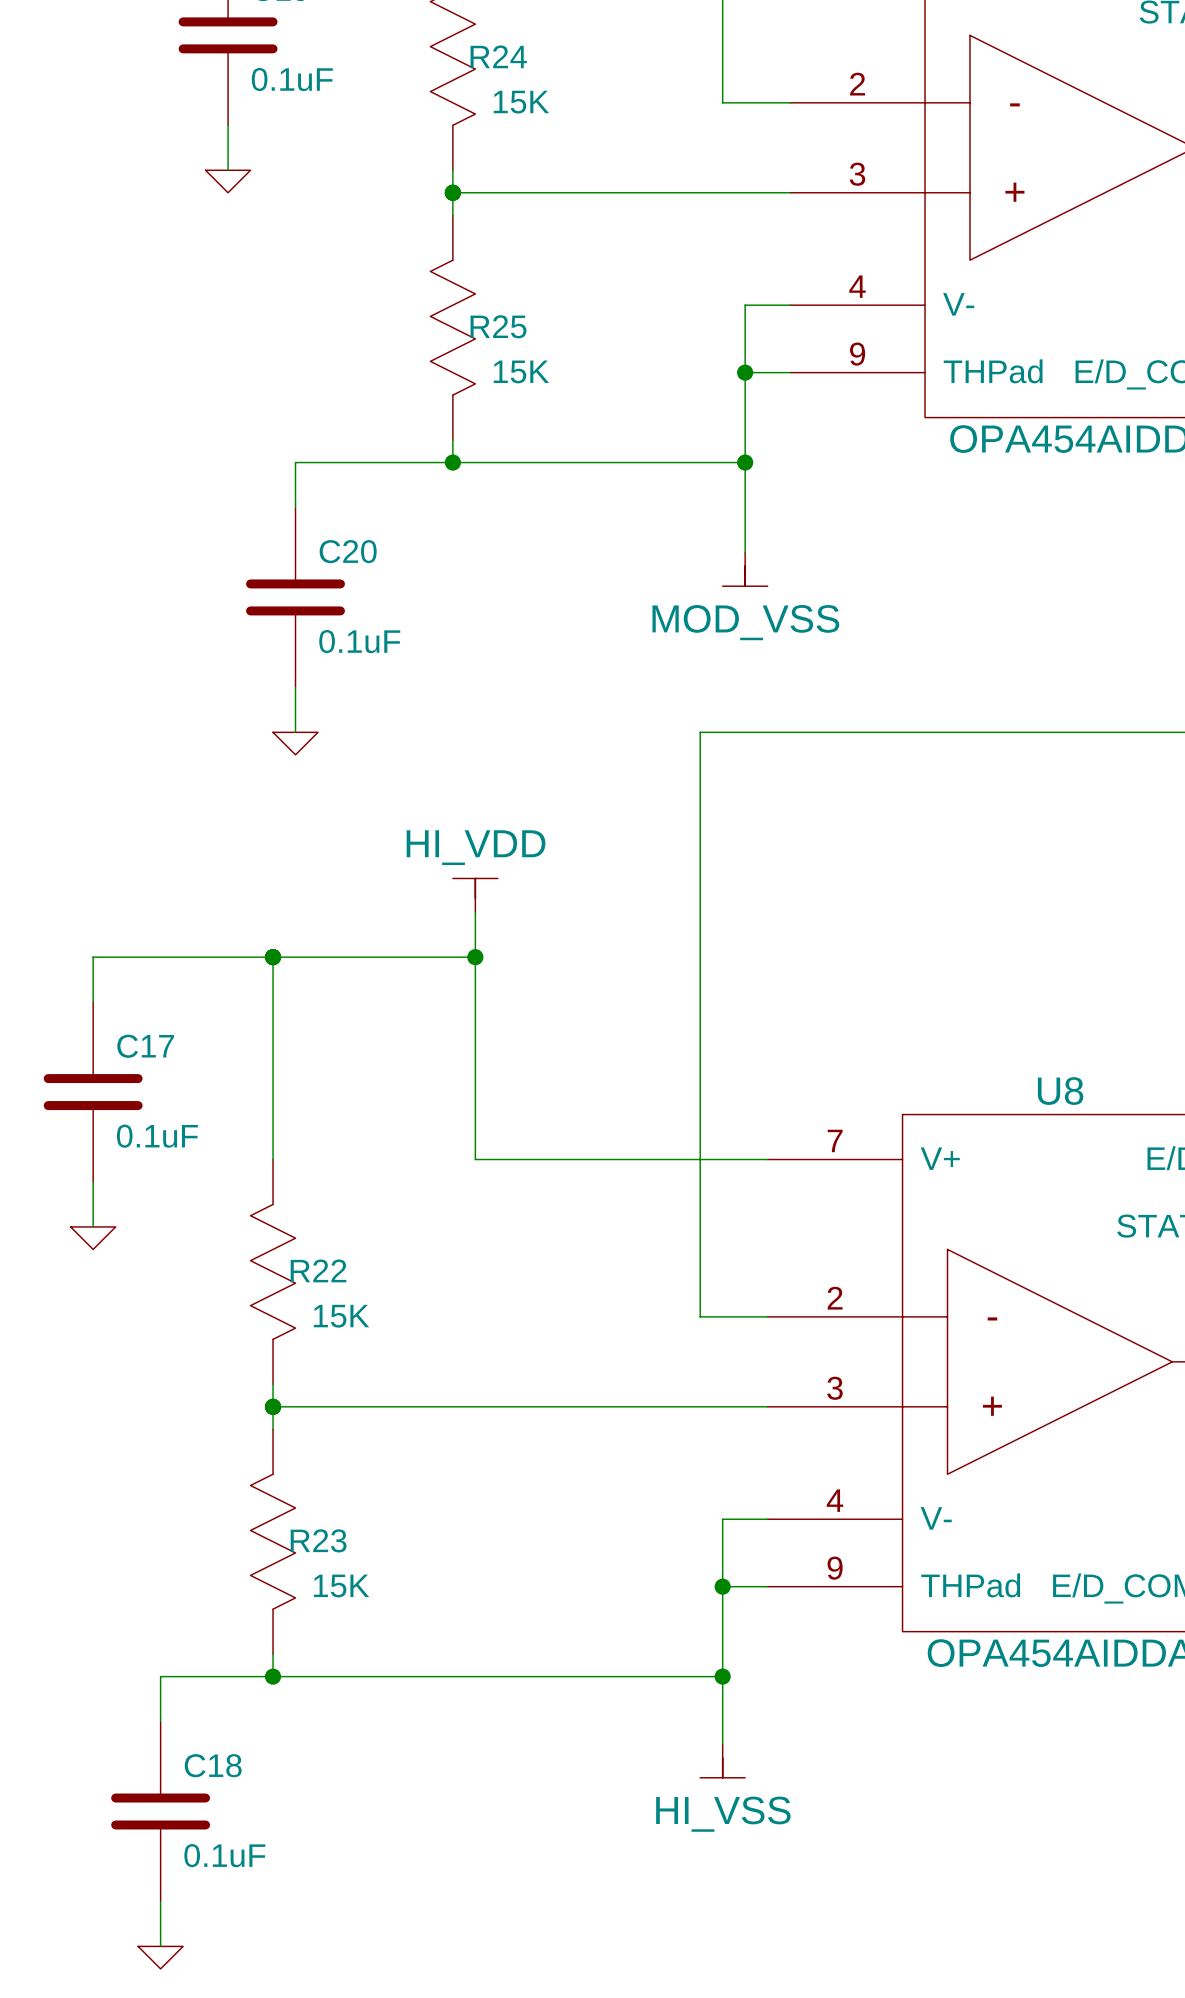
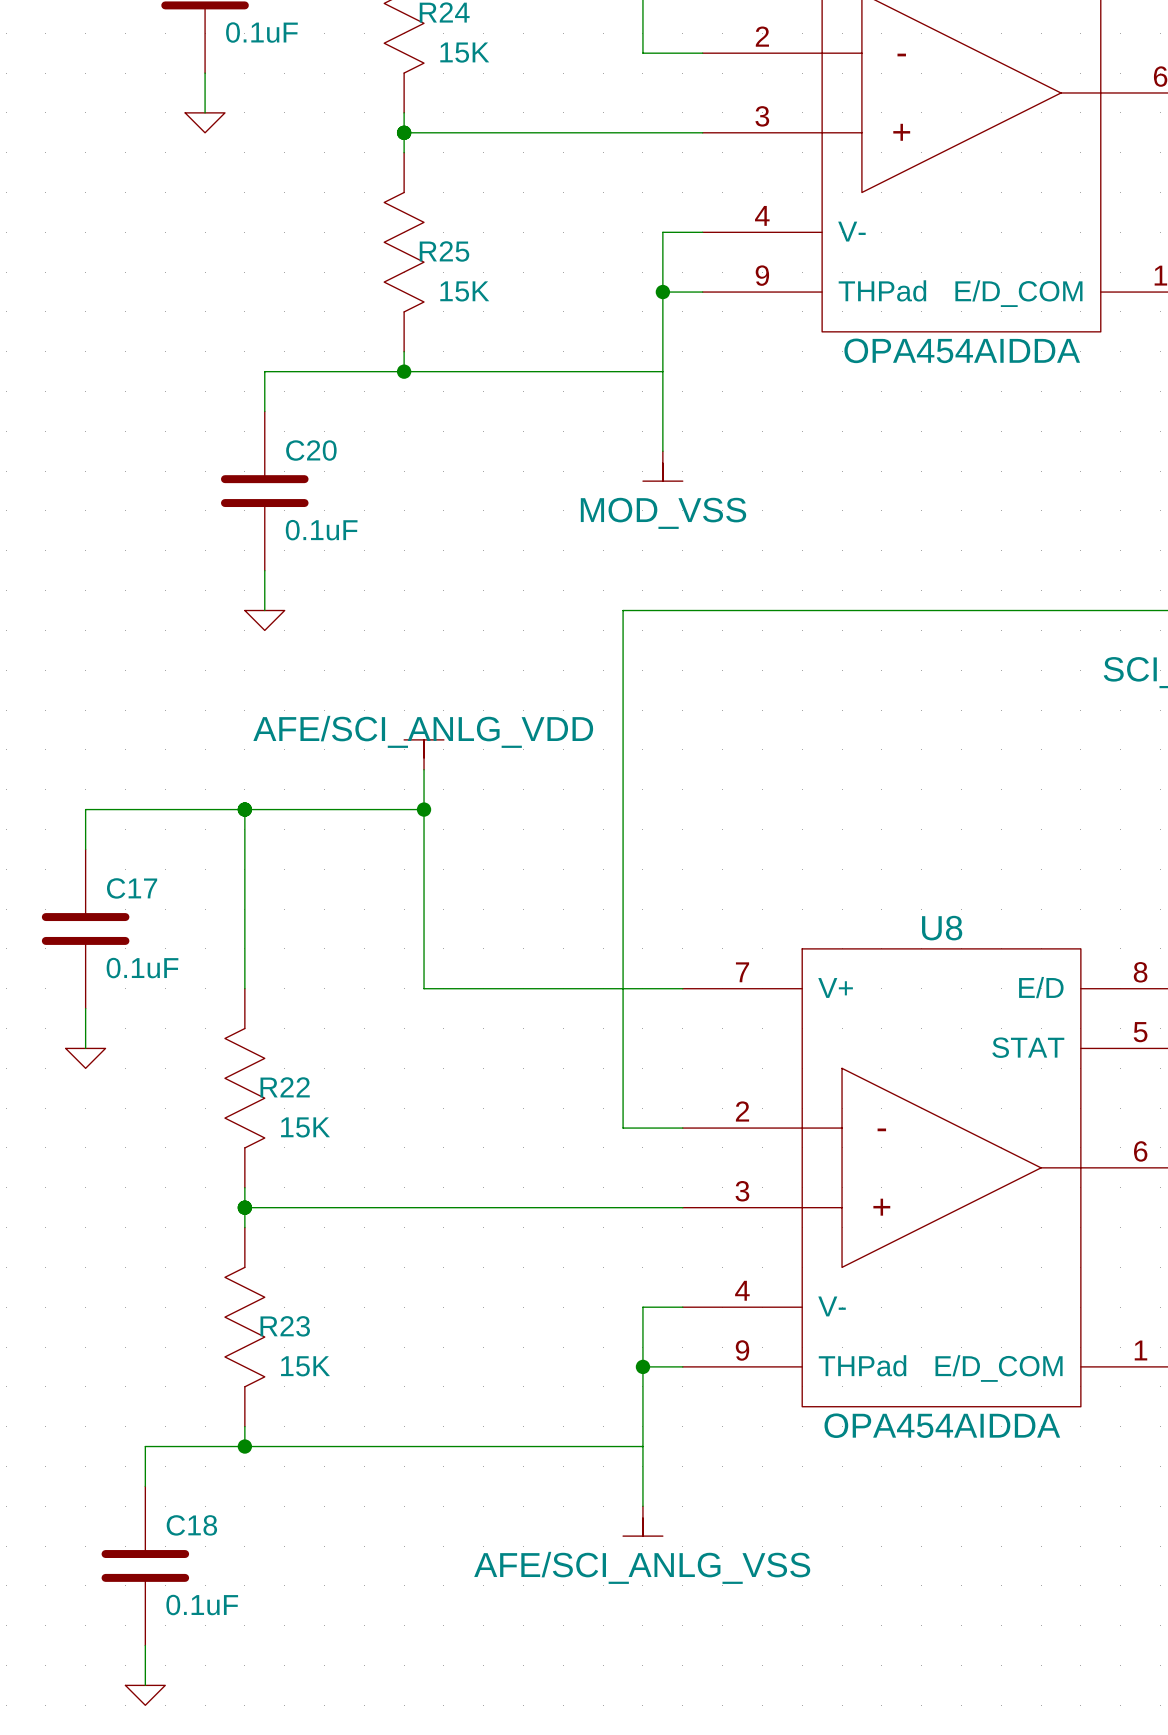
junction: (745, 462) -> none
power symbol: HI_VDD (475, 895) -> AFE/SCI_ANLG_VDD (424, 754)
junction: (722, 1676) -> none
power symbol: HI_VSS (722, 1760) -> AFE/SCI_ANLG_VSS (642, 1521)

